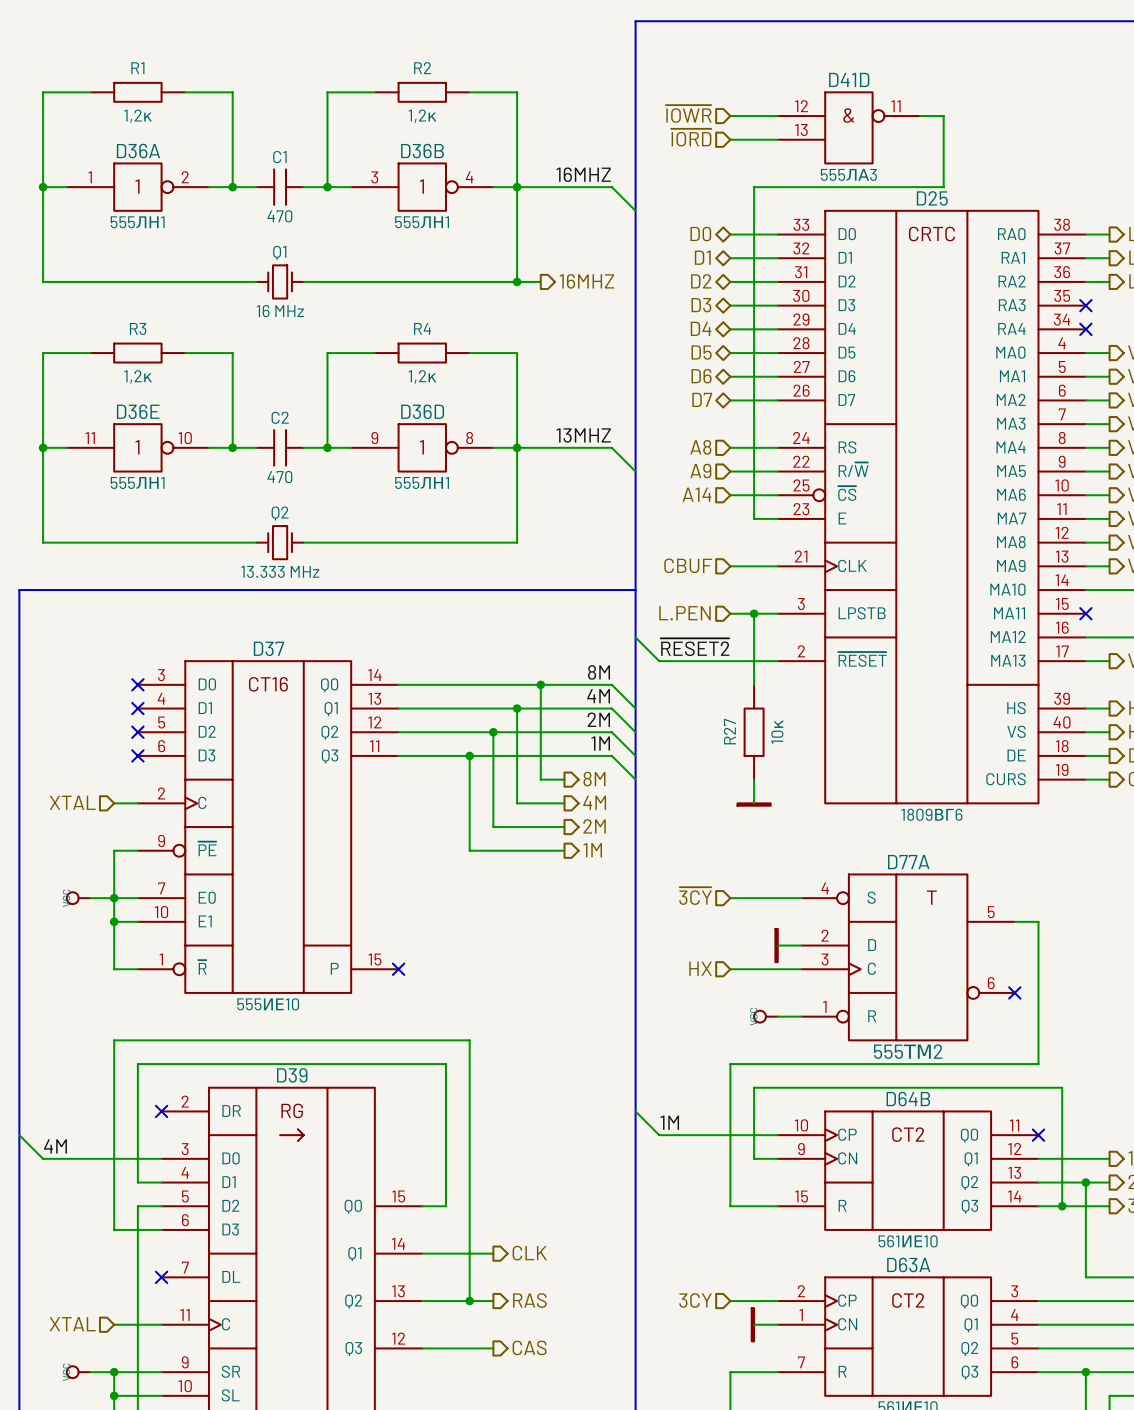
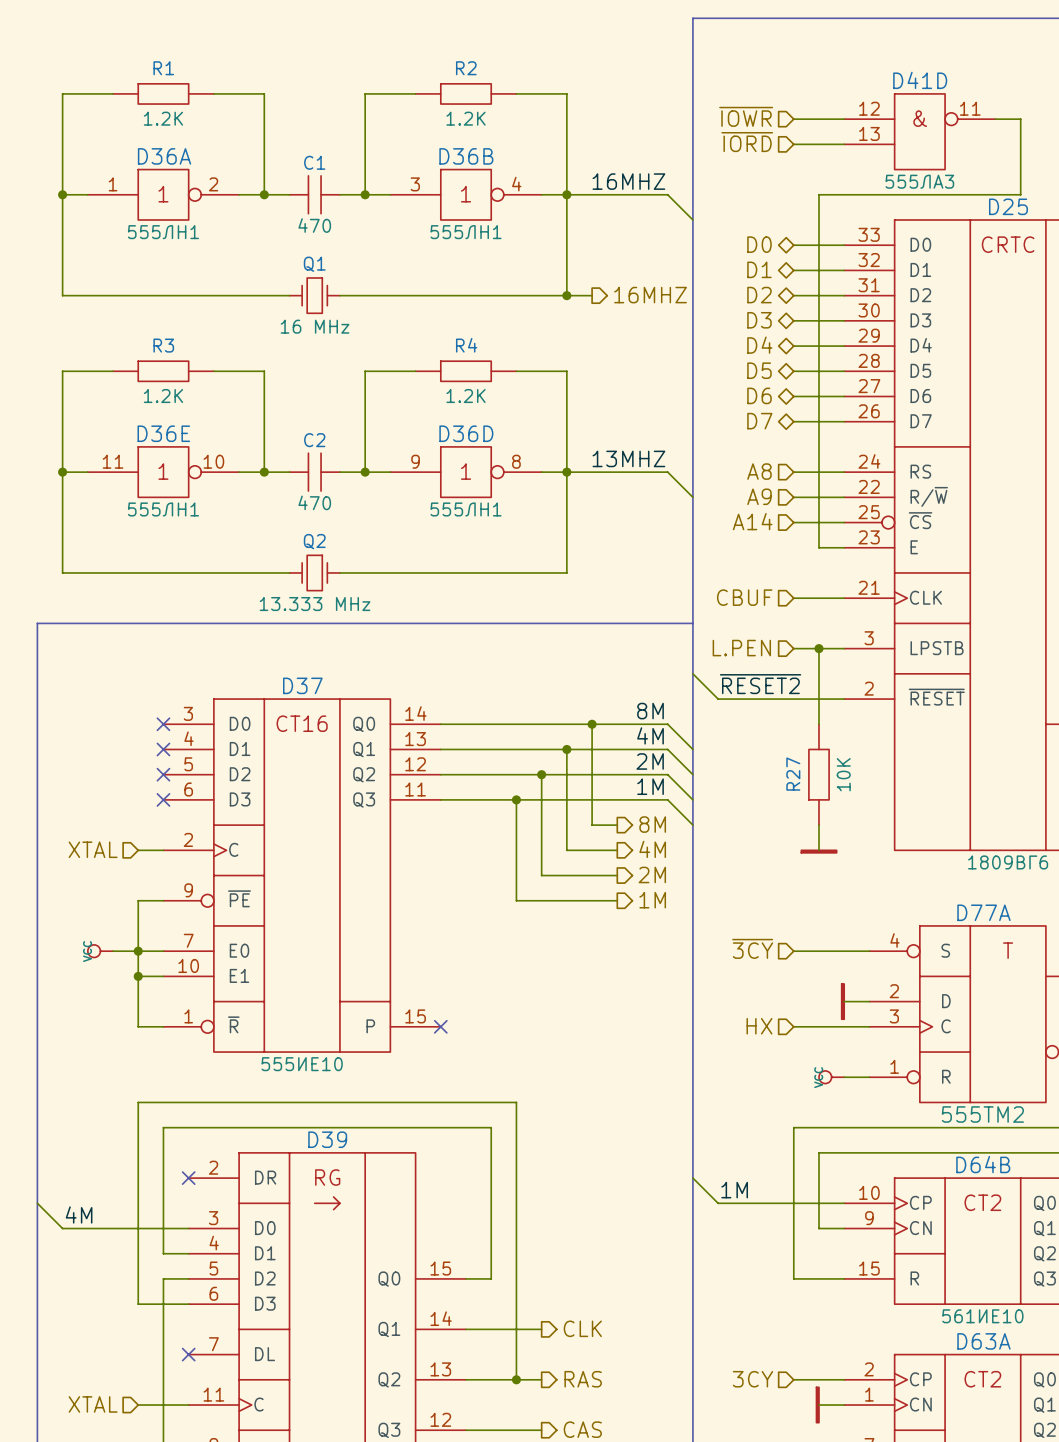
R1 value: 1,2к (138, 116) -> 1.2K (163, 118)
R2 value: 1,2к (422, 116) -> 1.2K (466, 118)
R3 value: 1,2к (138, 376) -> 1.2K (163, 396)
R4 value: 1,2к (422, 376) -> 1.2K (466, 396)
R27 value: 10к (777, 732) -> 10K (843, 774)

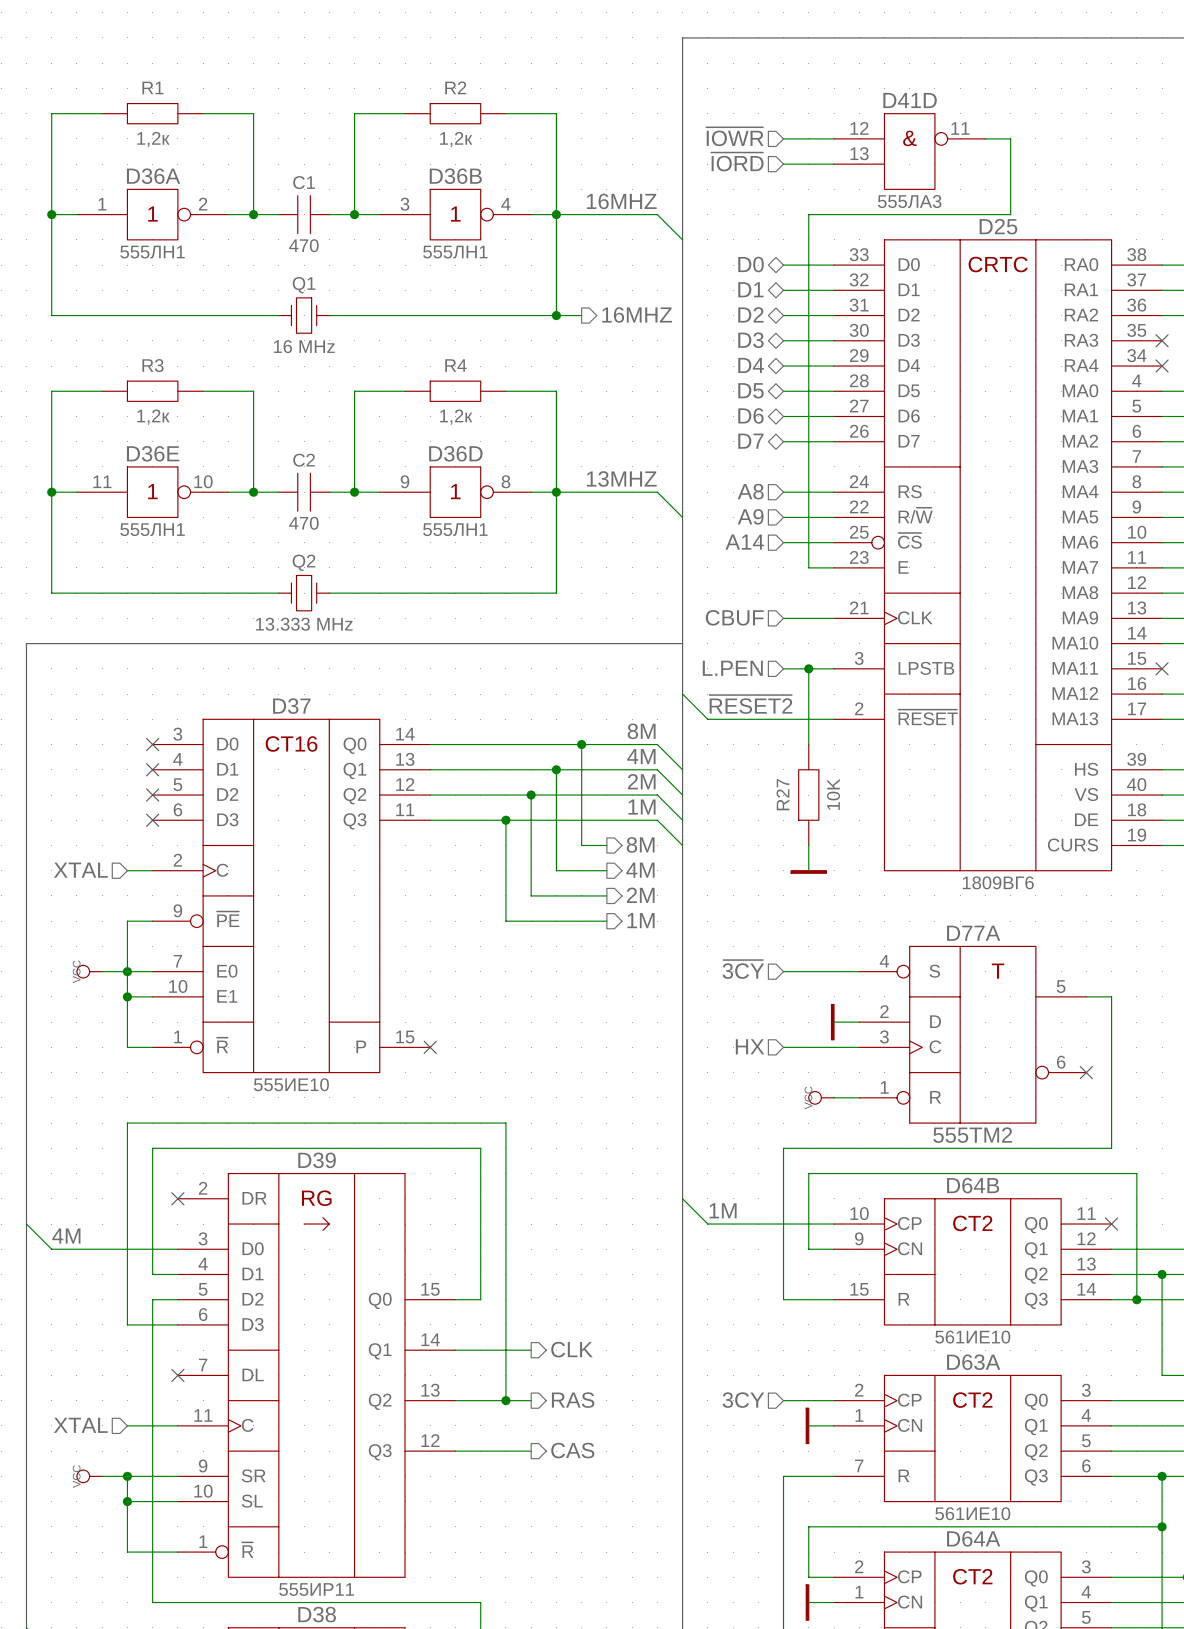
R1 value: 1.2K (163, 118) -> 1,2к (153, 139)
R2 value: 1.2K (466, 118) -> 1,2к (456, 139)
R3 value: 1.2K (163, 396) -> 1,2к (153, 417)
R4 value: 1.2K (466, 396) -> 1,2к (456, 417)

